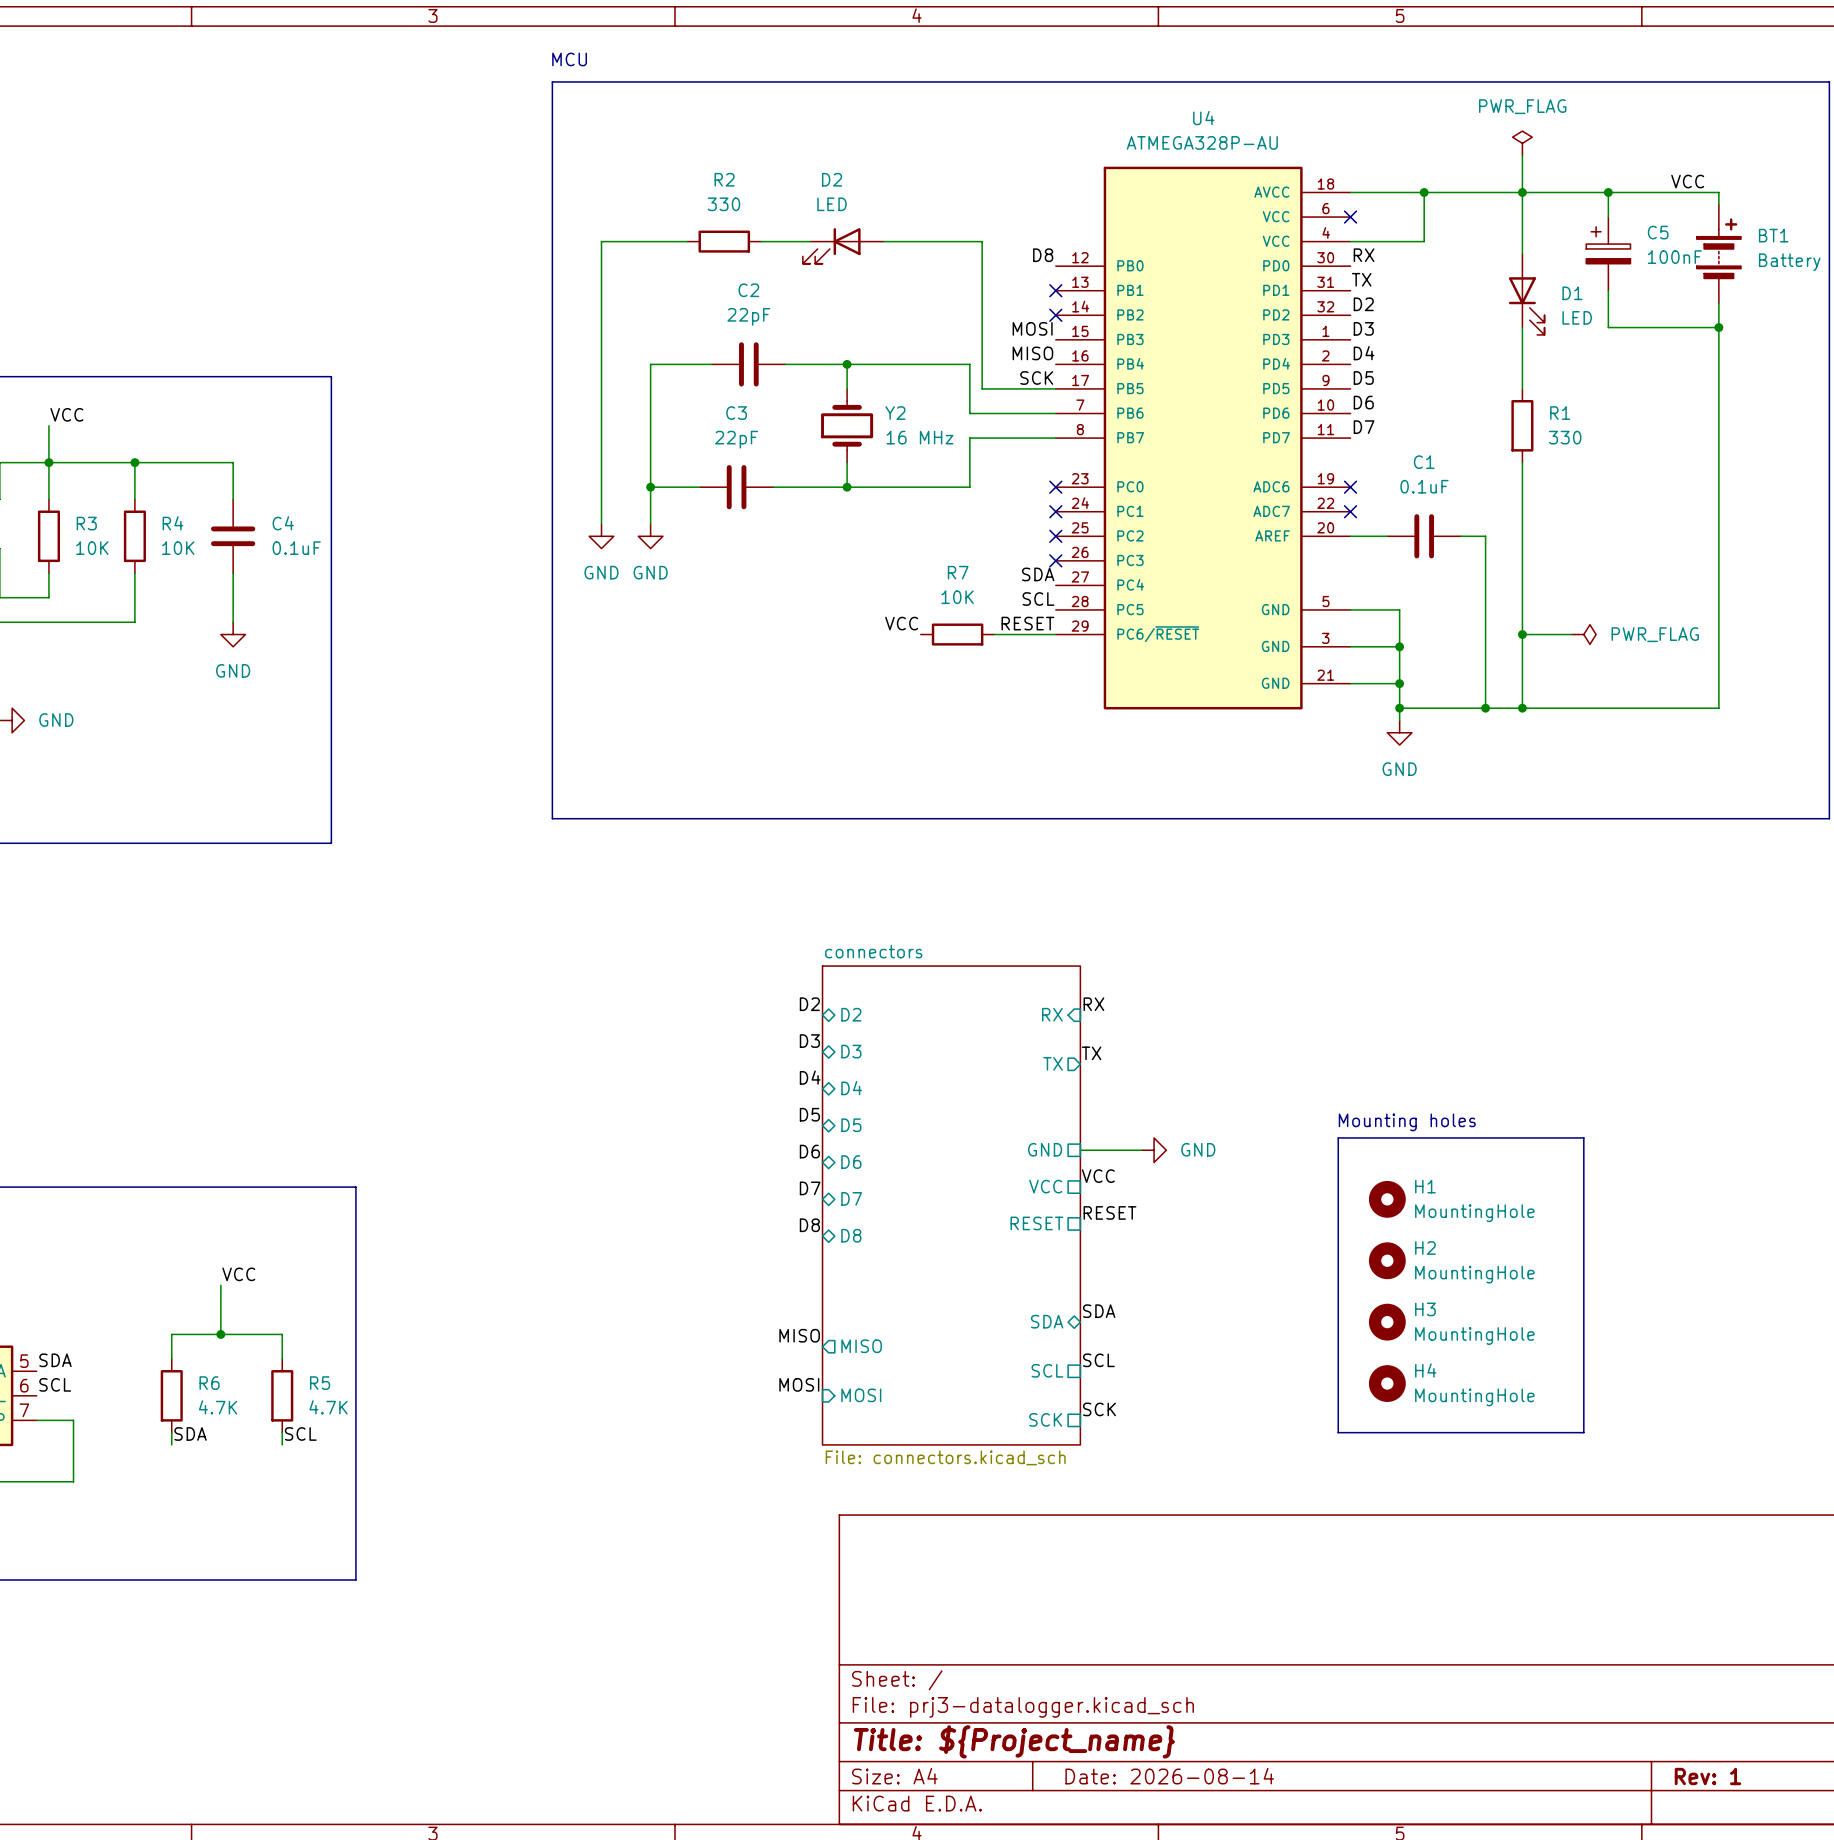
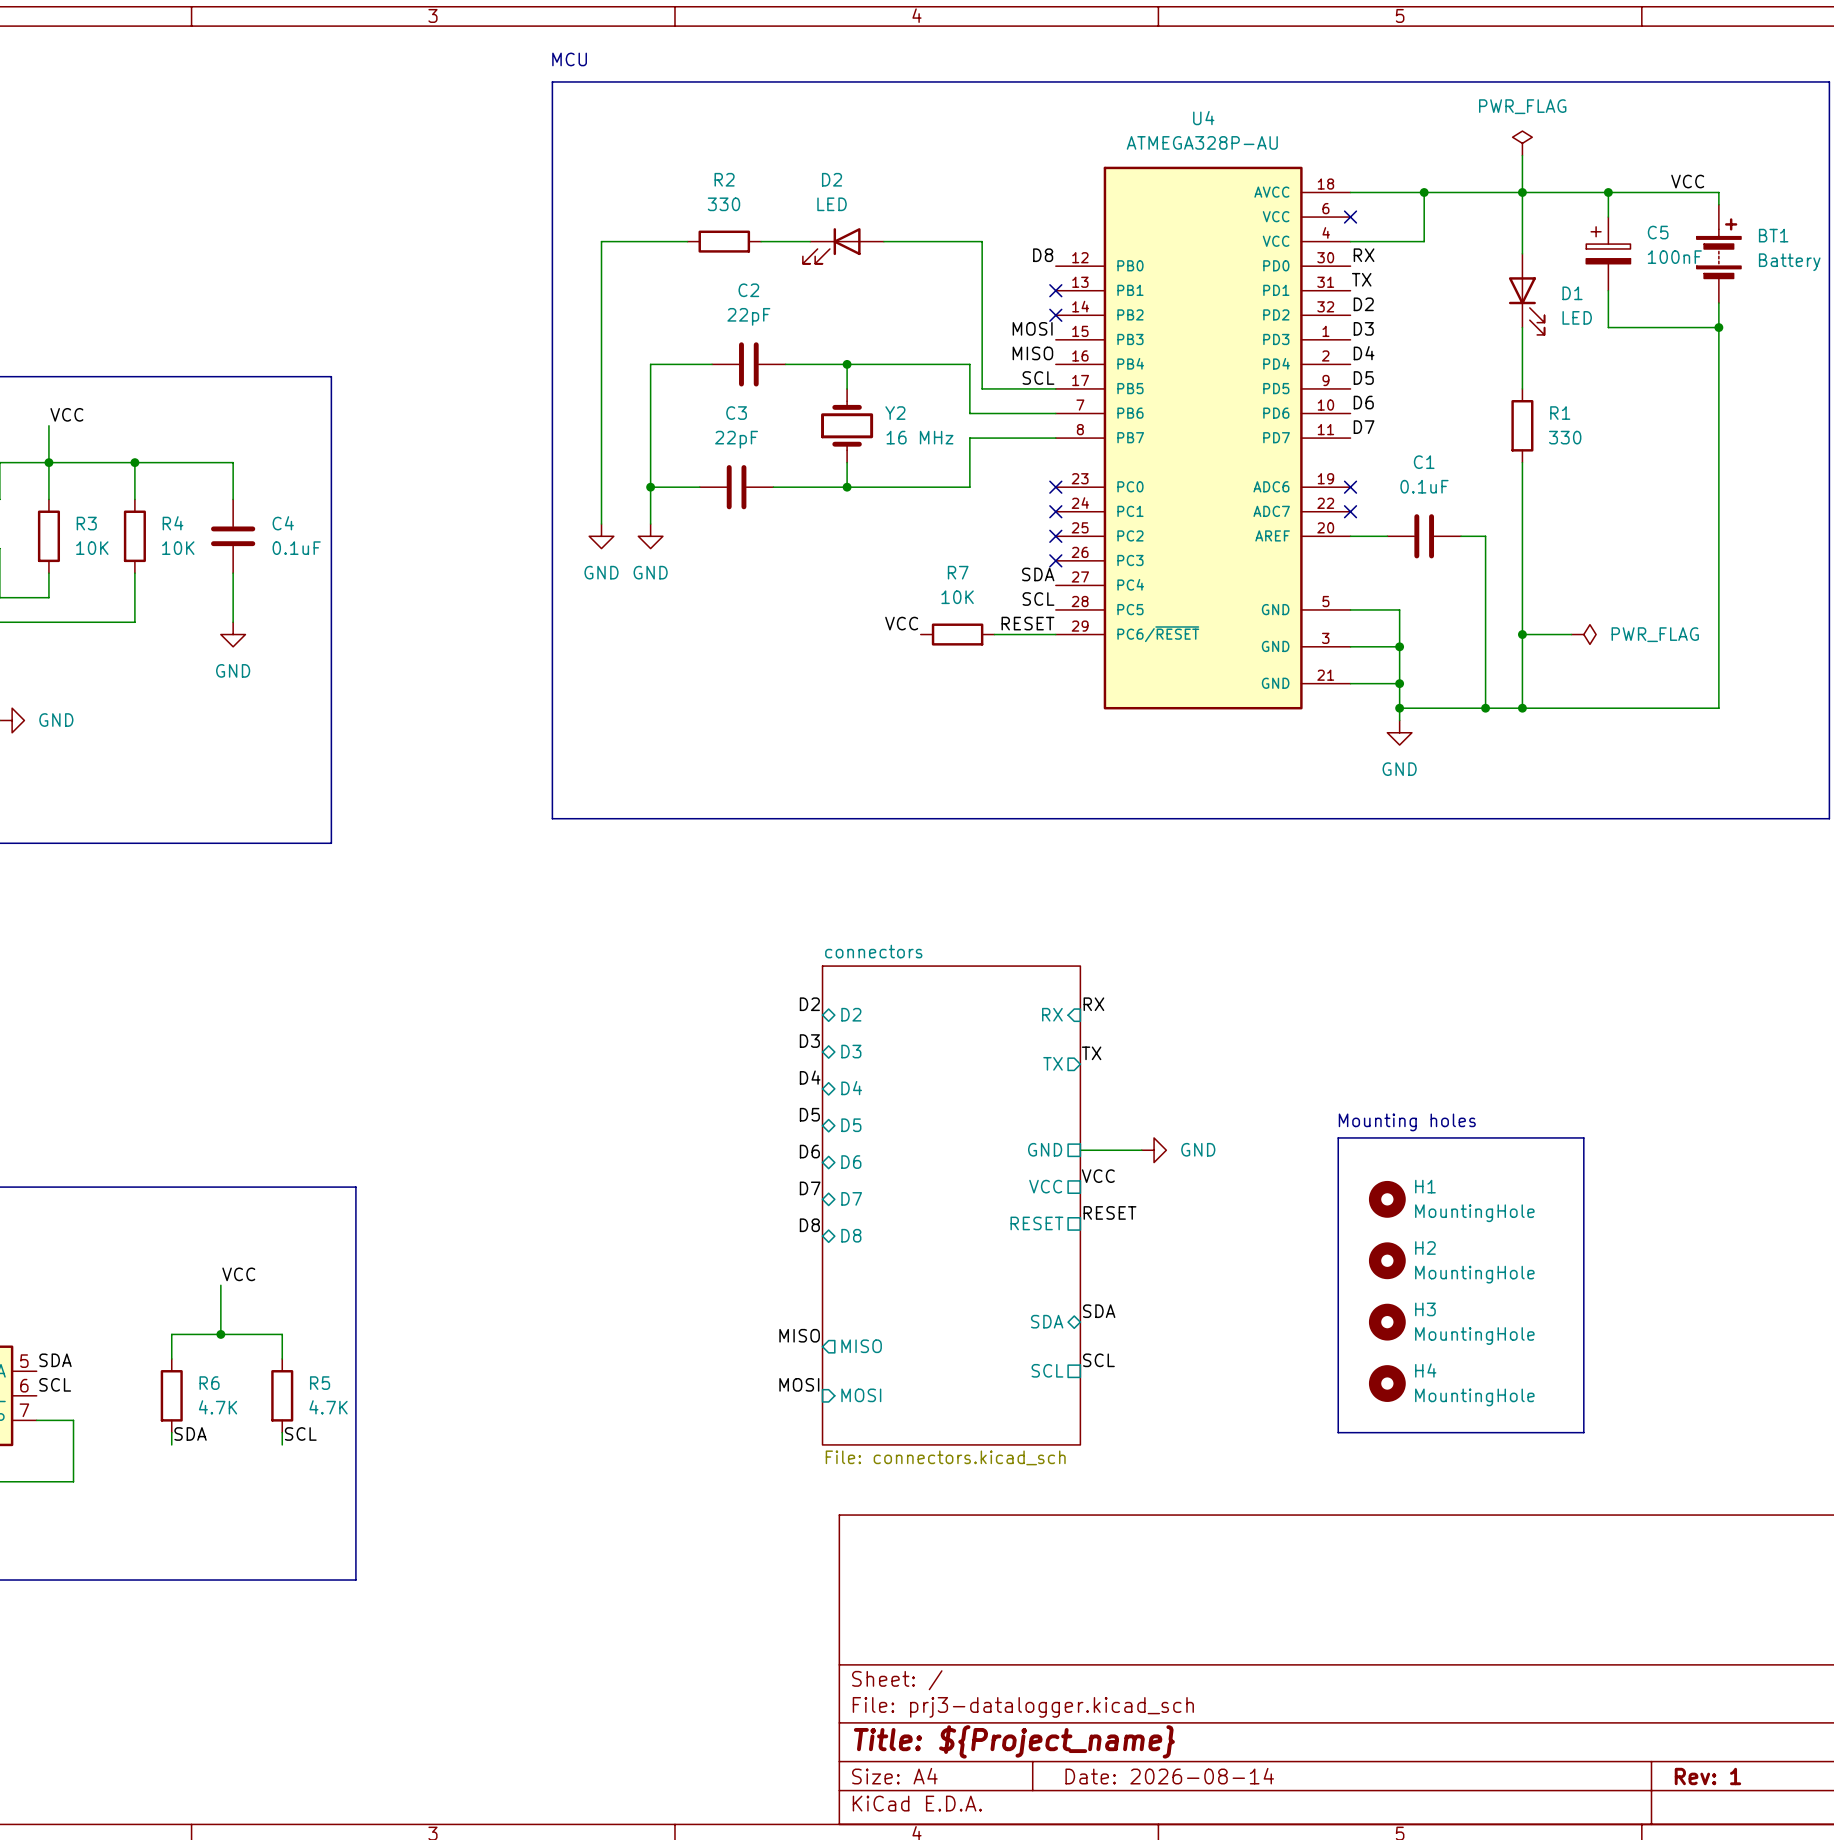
label: SCK (1036, 377) -> SCL (1038, 377)
label: SCK (1099, 1409) -> none
sheet pin: SCK (1045, 1419) -> none

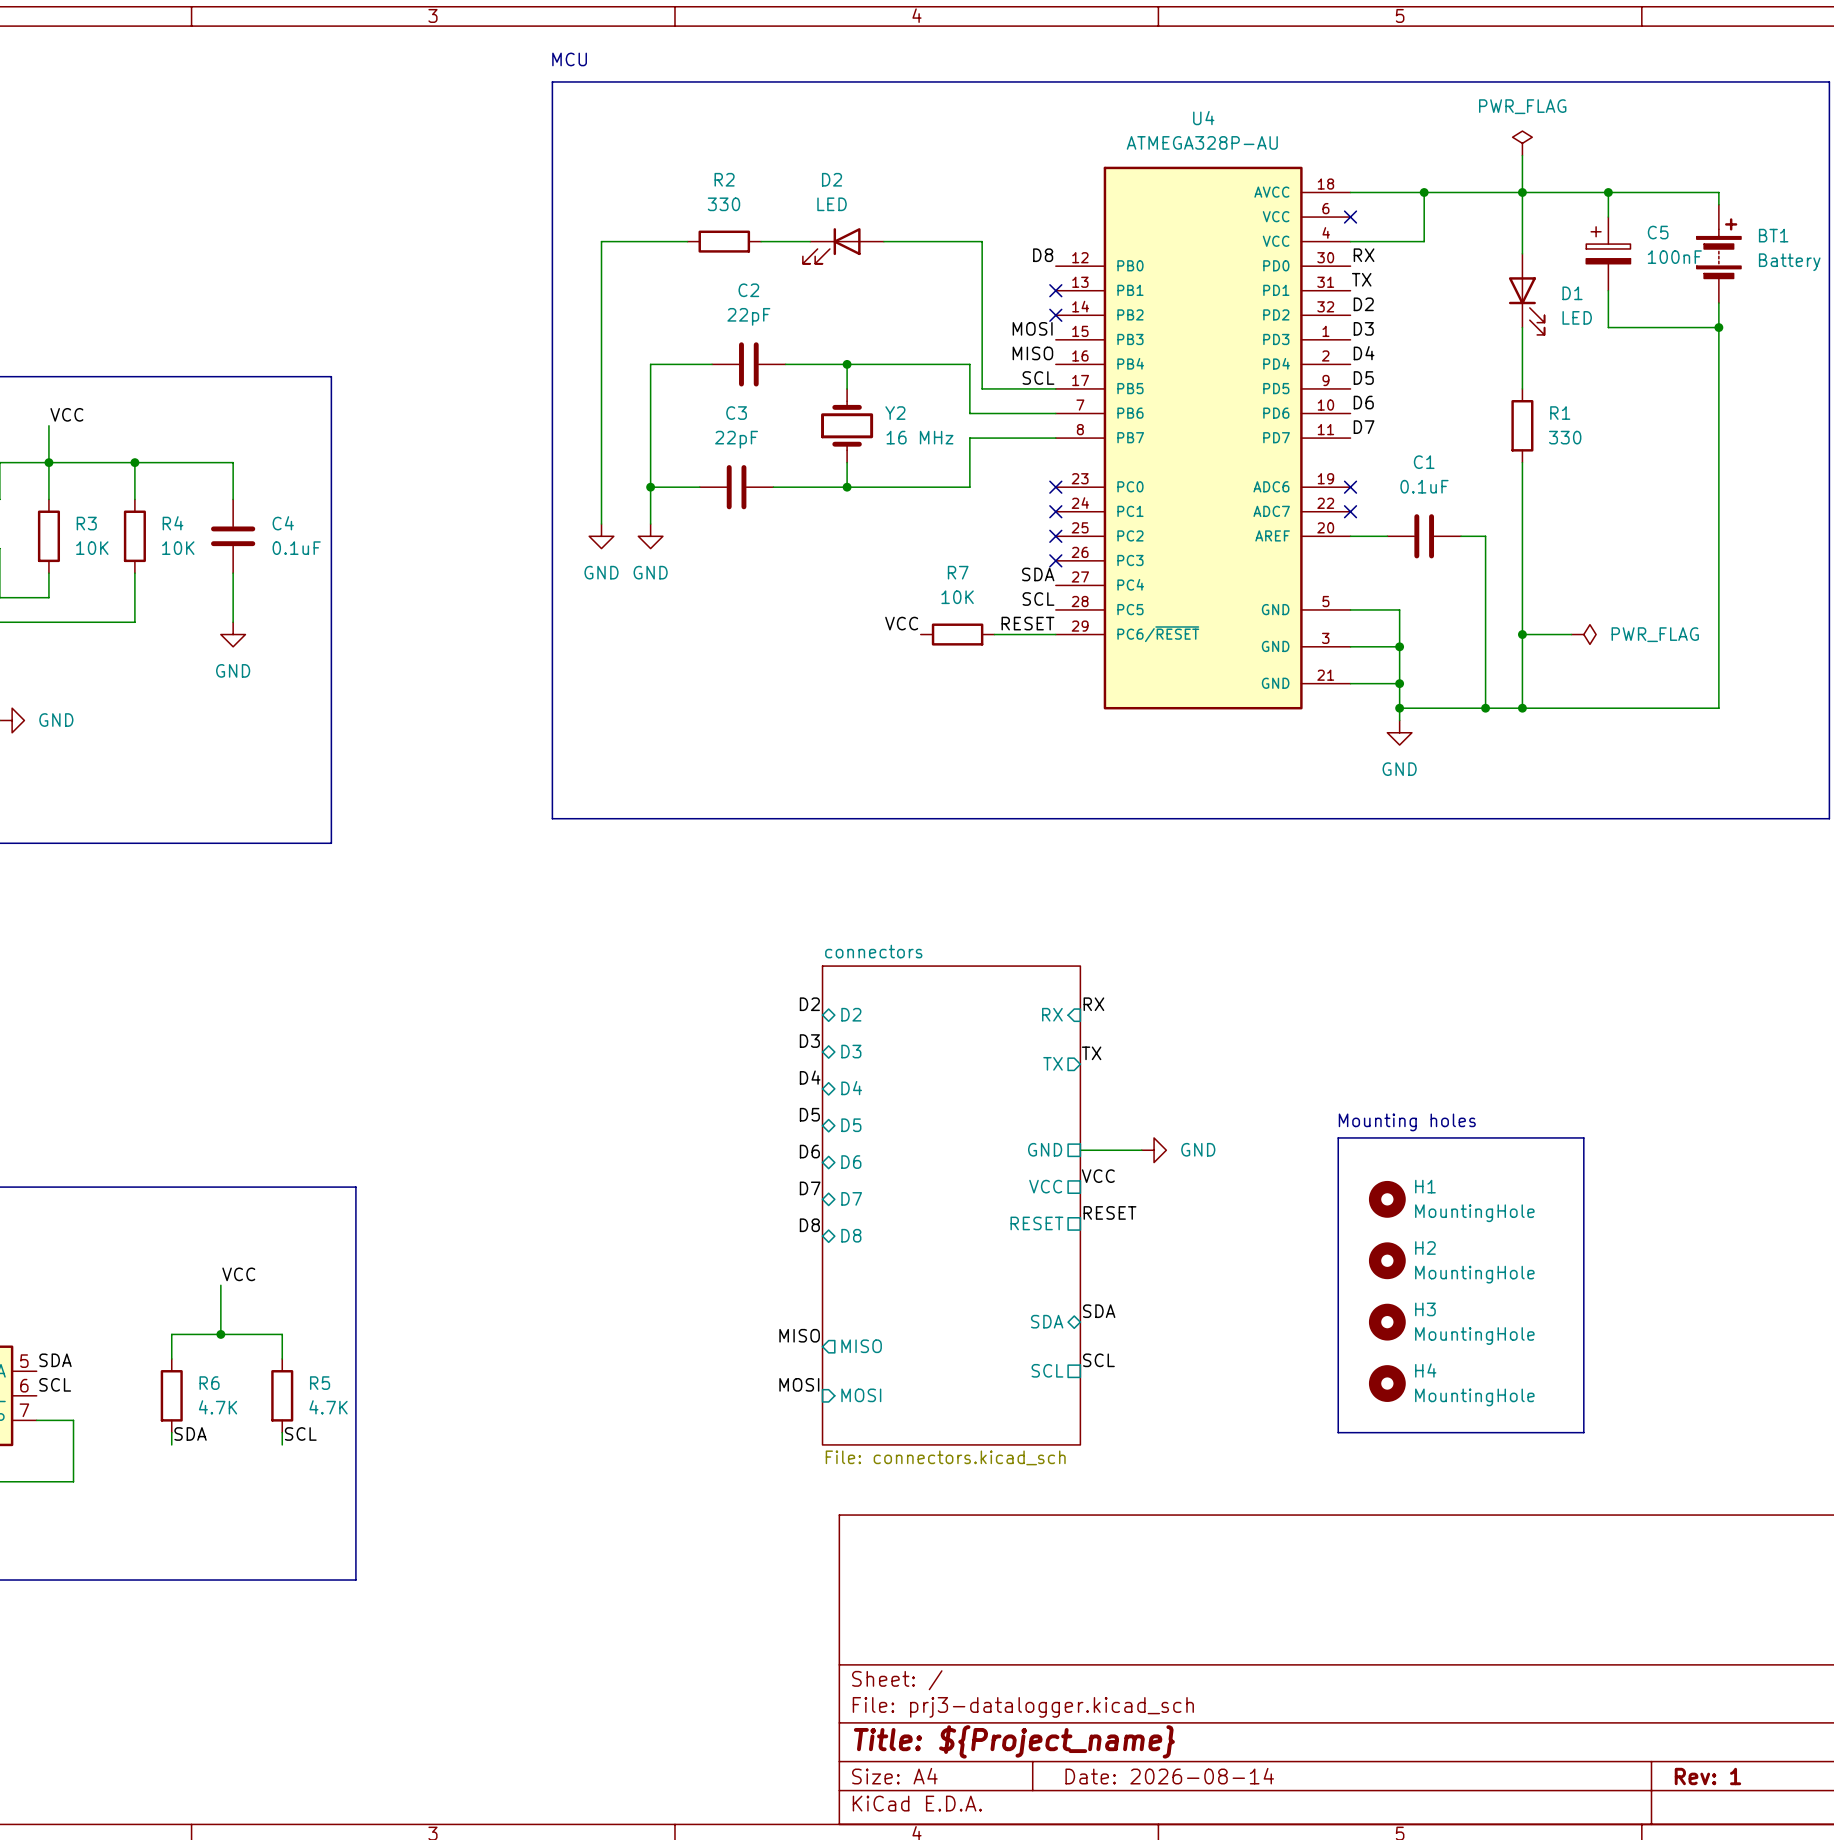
label: VCC (1687, 181) -> none

